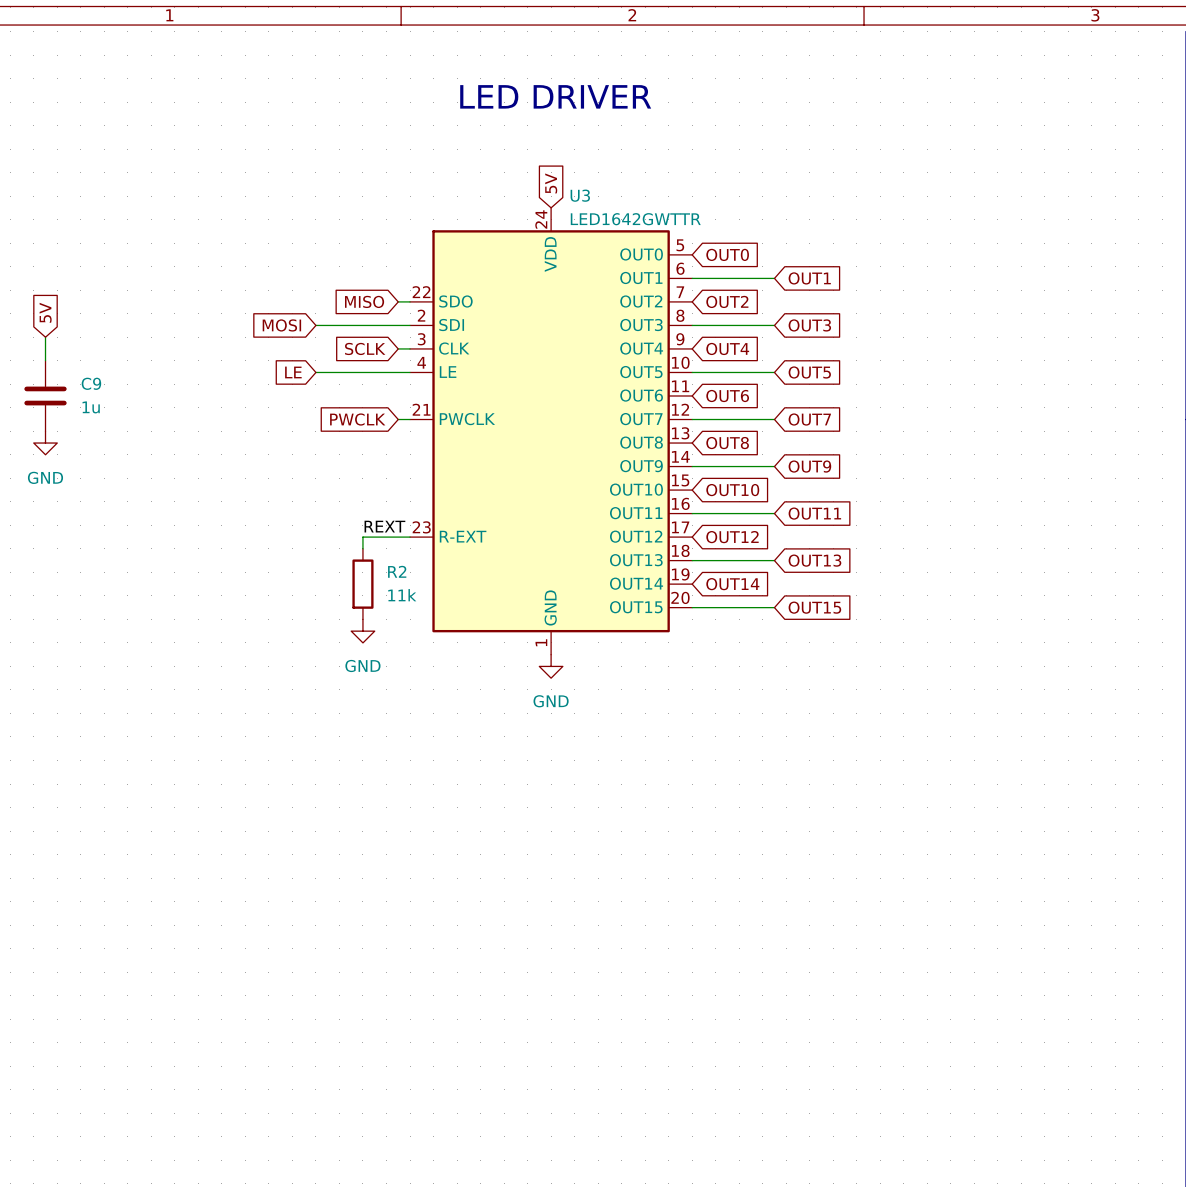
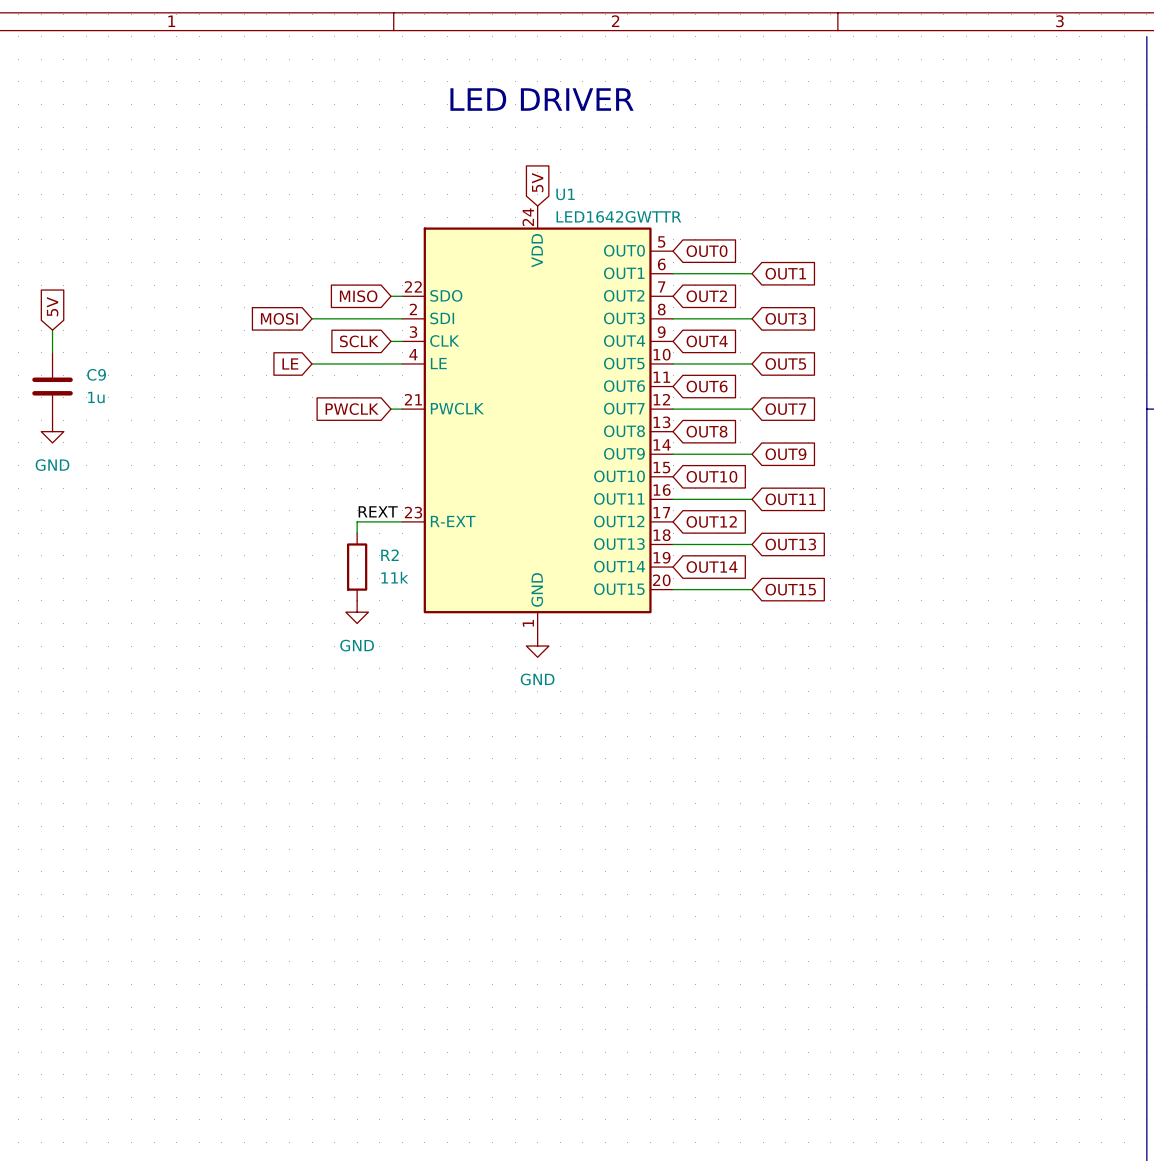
U3 name: U3 (580, 195) -> U1 (565, 194)

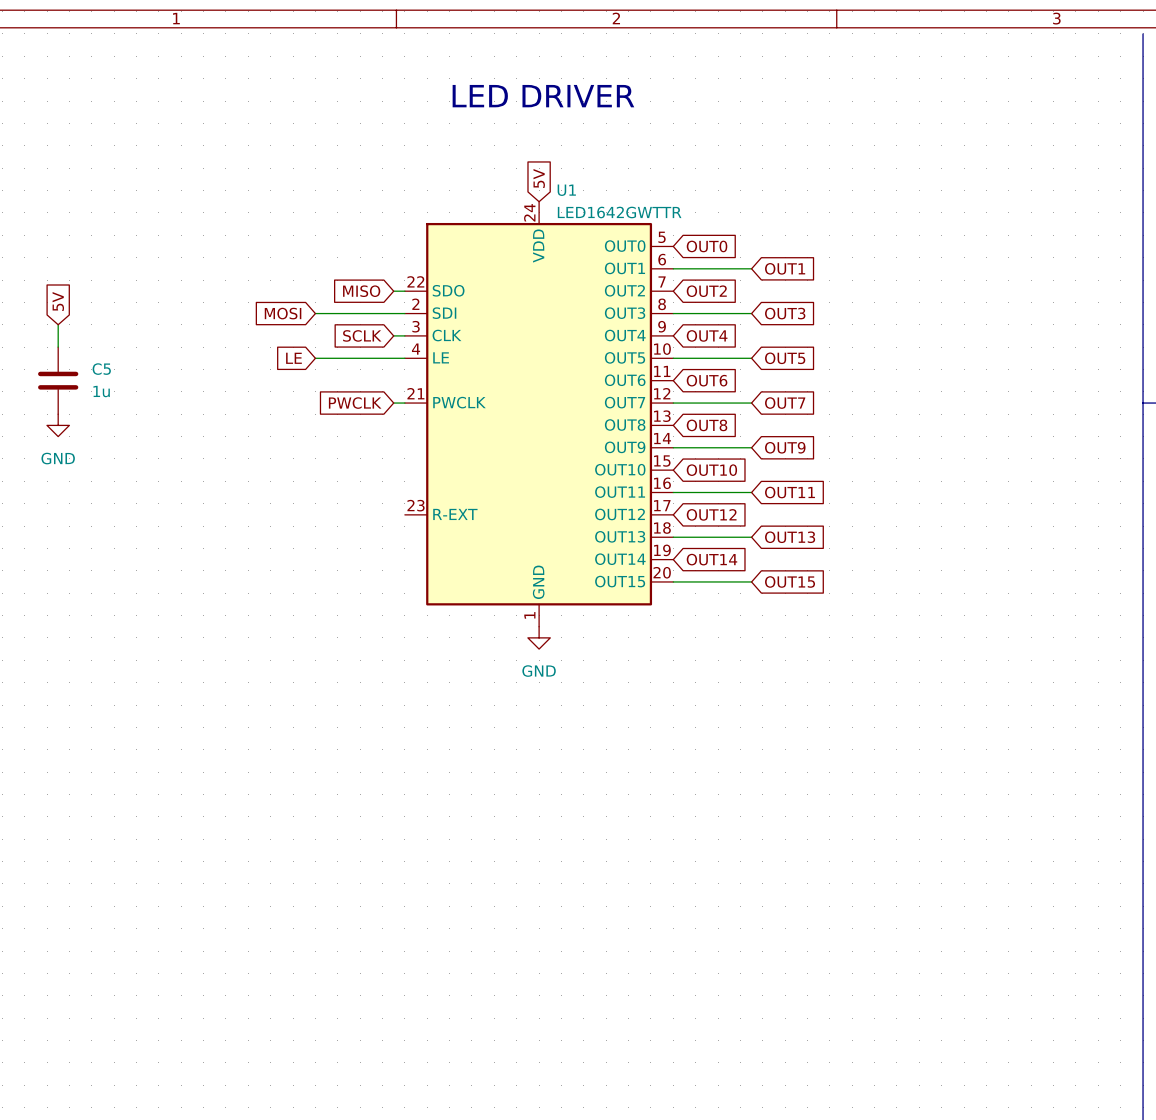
C9 name: C9 (96, 374) -> C5 (101, 369)
label: REXT (378, 511) -> none
wire: (402, 521) (357, 521) (357, 533) -> none
R2: 11k (357, 567) -> none
power symbol: GND (357, 612) -> none

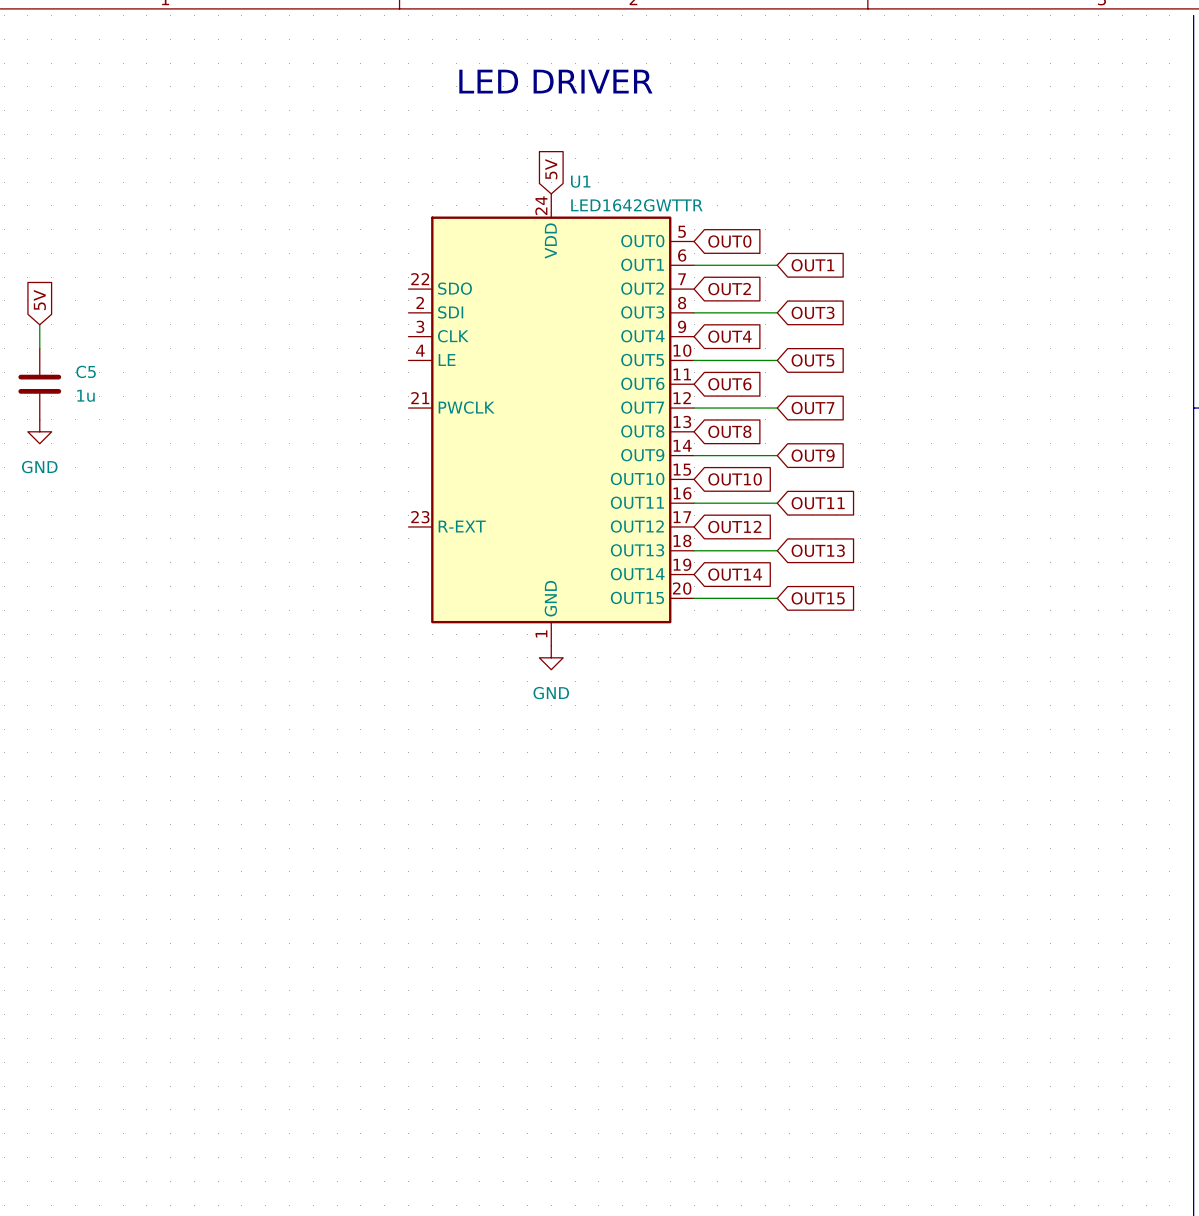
global label: MISO (361, 291) -> none
wire: (393, 291) (404, 291) -> none
global label: MOSI (283, 313) -> none
wire: (315, 313) (404, 313) -> none
global label: SCLK (362, 335) -> none
wire: (393, 335) (404, 335) -> none
global label: LE (293, 358) -> none
wire: (315, 358) (404, 358) -> none
global label: PWCLK (355, 403) -> none
wire: (393, 403) (404, 403) -> none

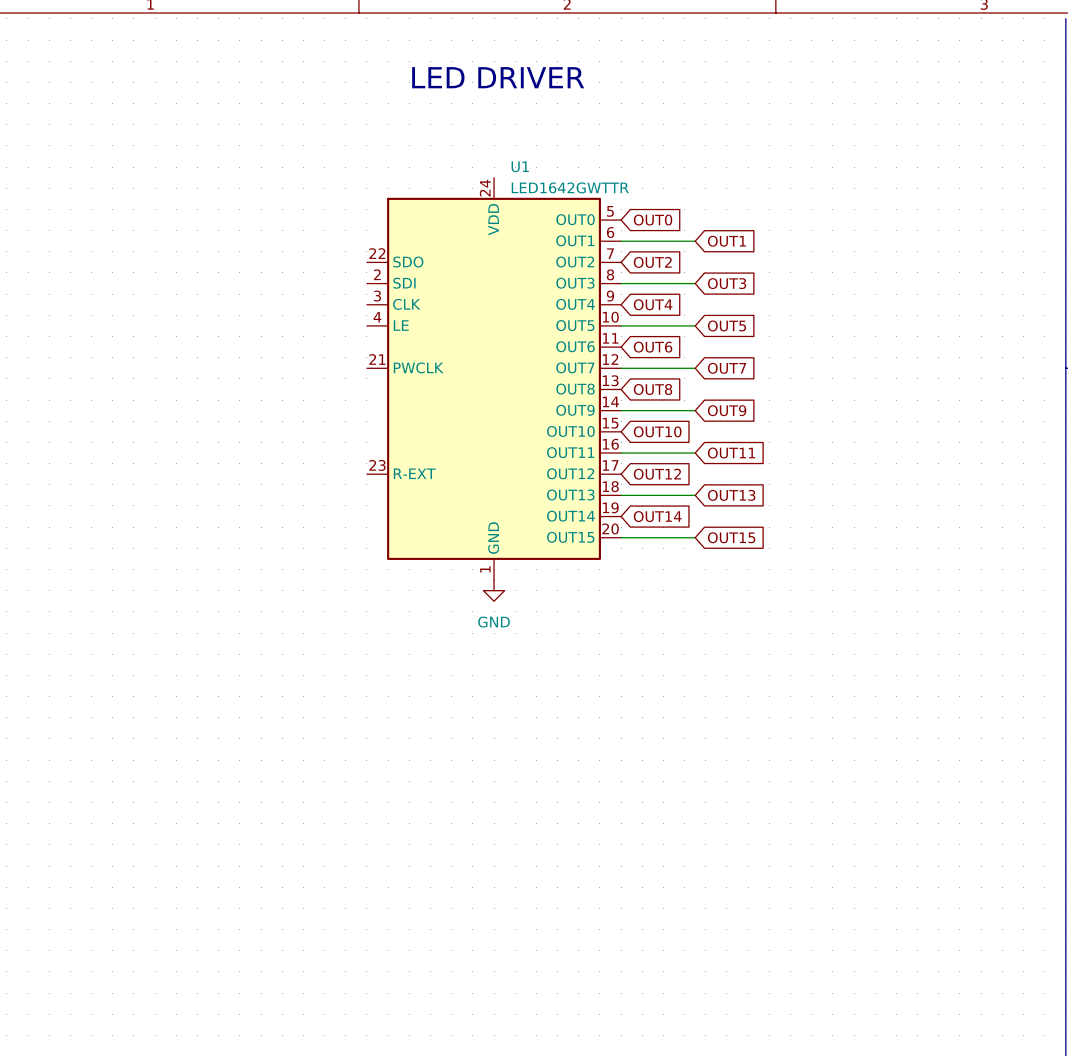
global label: 5V (551, 169) -> none
global label: 5V (39, 300) -> none
wire: (39, 324) (39, 348) -> none
C5: 1u (39, 384) -> none
power symbol: GND (39, 431) -> none

